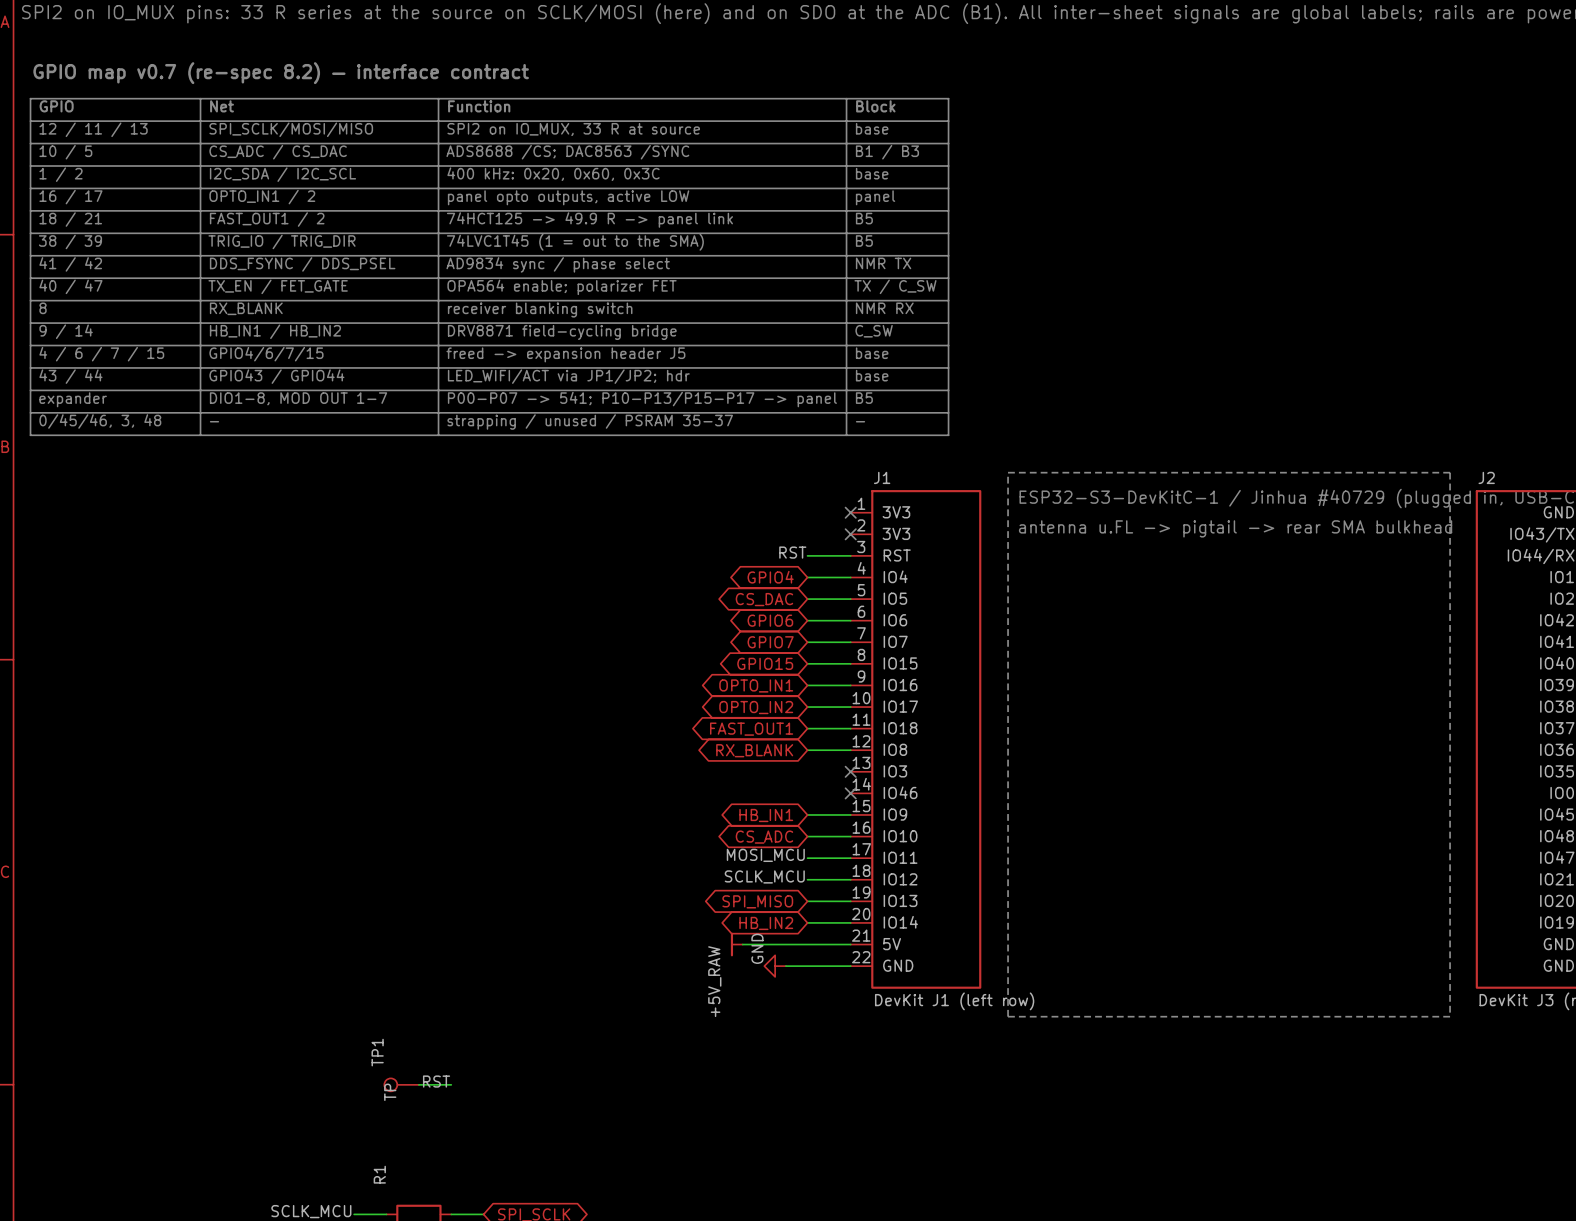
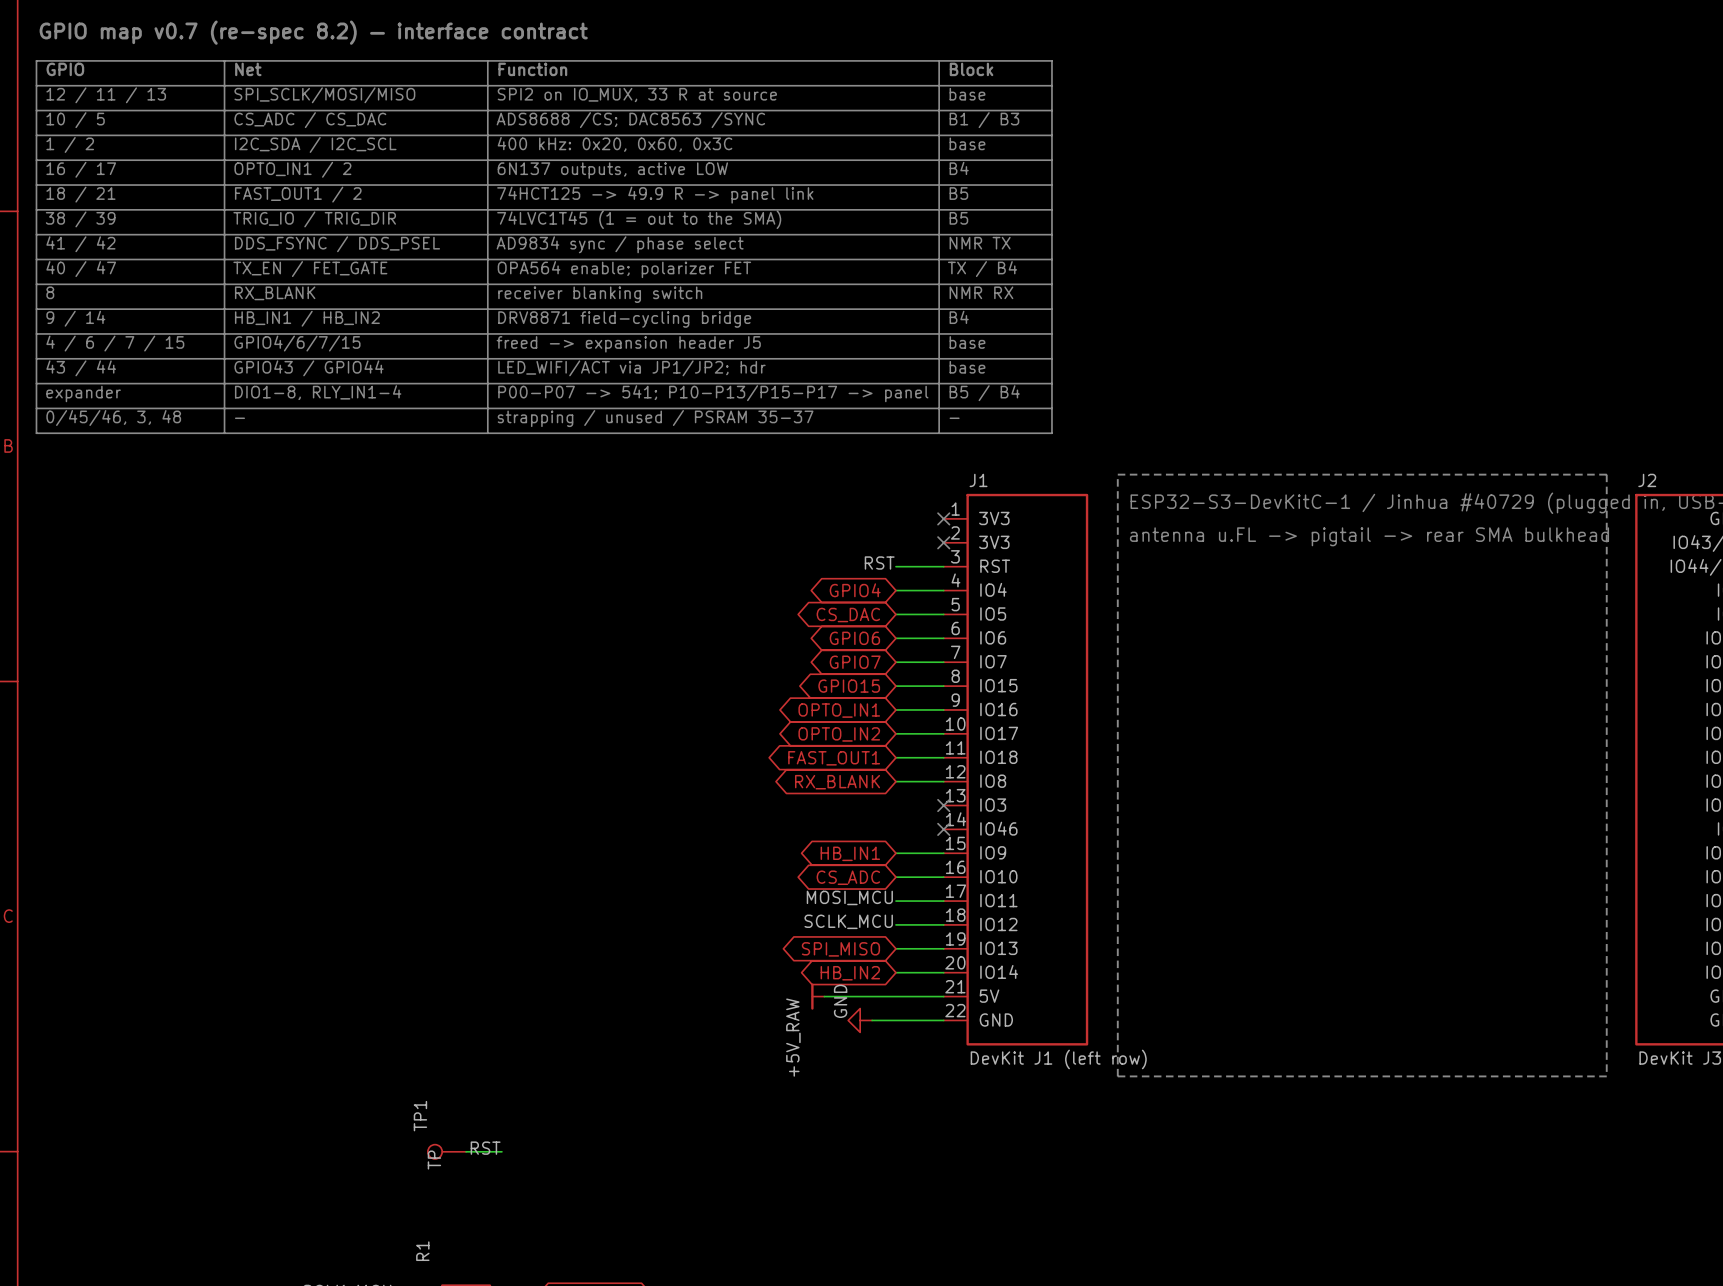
text: panel opto outputs, active LOW (568, 197) -> 6N137 outputs, active LOW (612, 170)
text: panel (875, 197) -> B4 (959, 168)
text: TX / C_SW (895, 286) -> TX / B4 (982, 269)
text: C_SW (874, 331) -> B4 (959, 317)
text: DIO1-8, MOD OUT 1-7 (298, 398) -> DIO1-8, RLY_IN1-4 (318, 392)
text: B5 (864, 398) -> B5 / B4 (984, 393)

